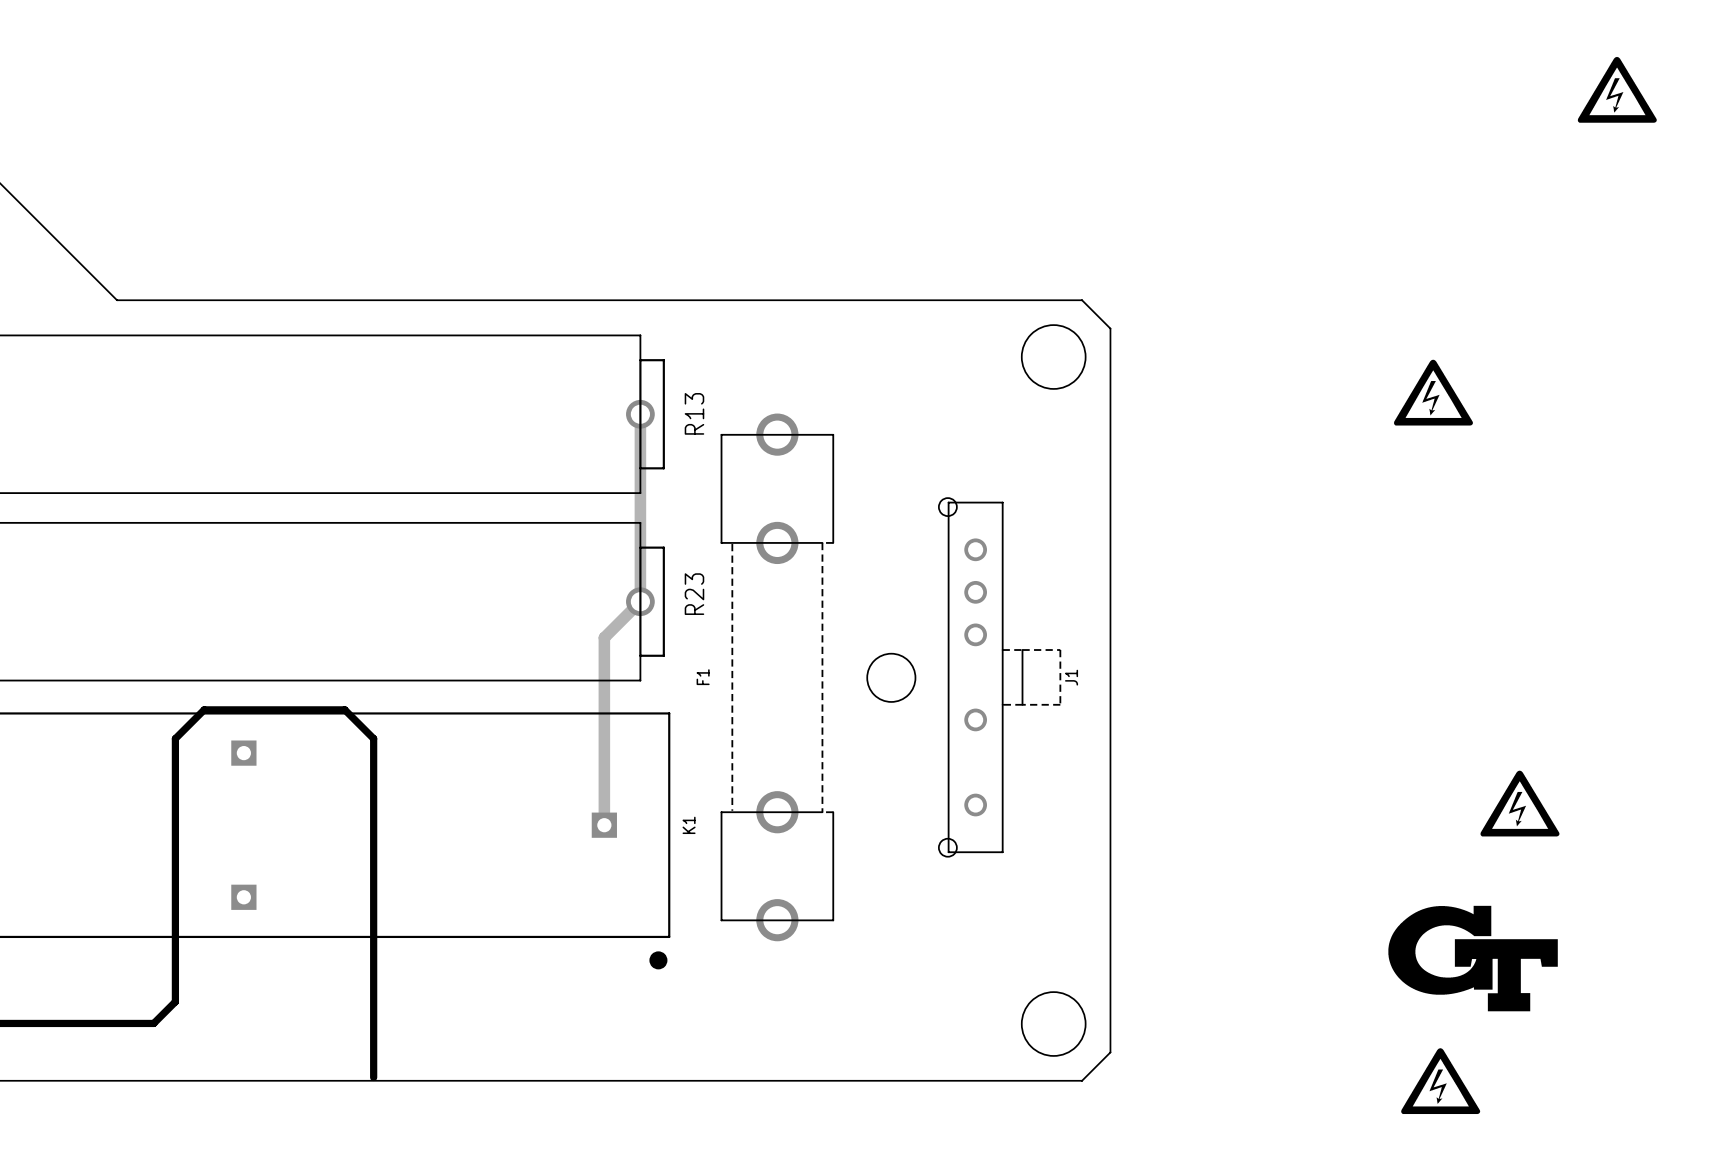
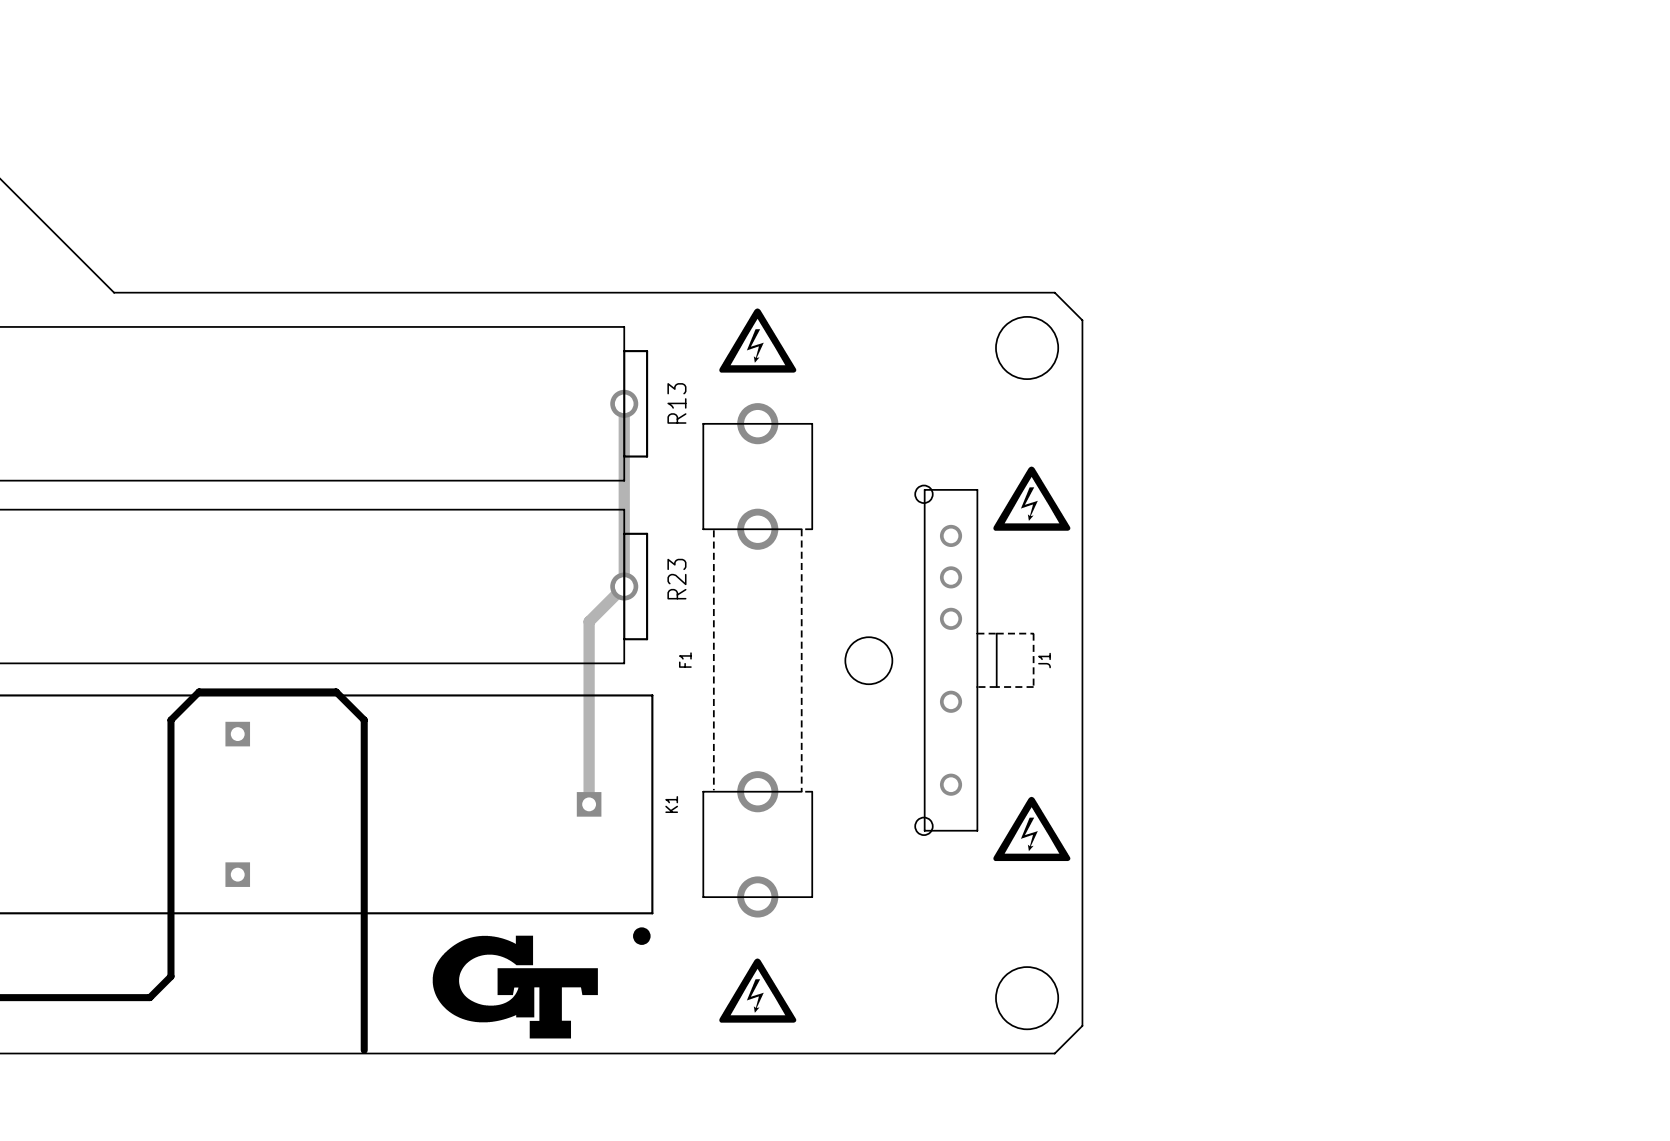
drawing: [1577, 56, 1657, 123] -> none
drawing: none -> [719, 308, 797, 373]
drawing: [1393, 359, 1473, 426] -> none
drawing: none -> [993, 466, 1071, 531]
drawing: [1480, 770, 1560, 837] -> none
drawing: none -> [993, 796, 1071, 862]
drawing: [1388, 905, 1558, 1012] -> none
drawing: none -> [432, 935, 598, 1039]
drawing: none -> [719, 958, 797, 1023]
drawing: [1401, 1048, 1481, 1115] -> none

